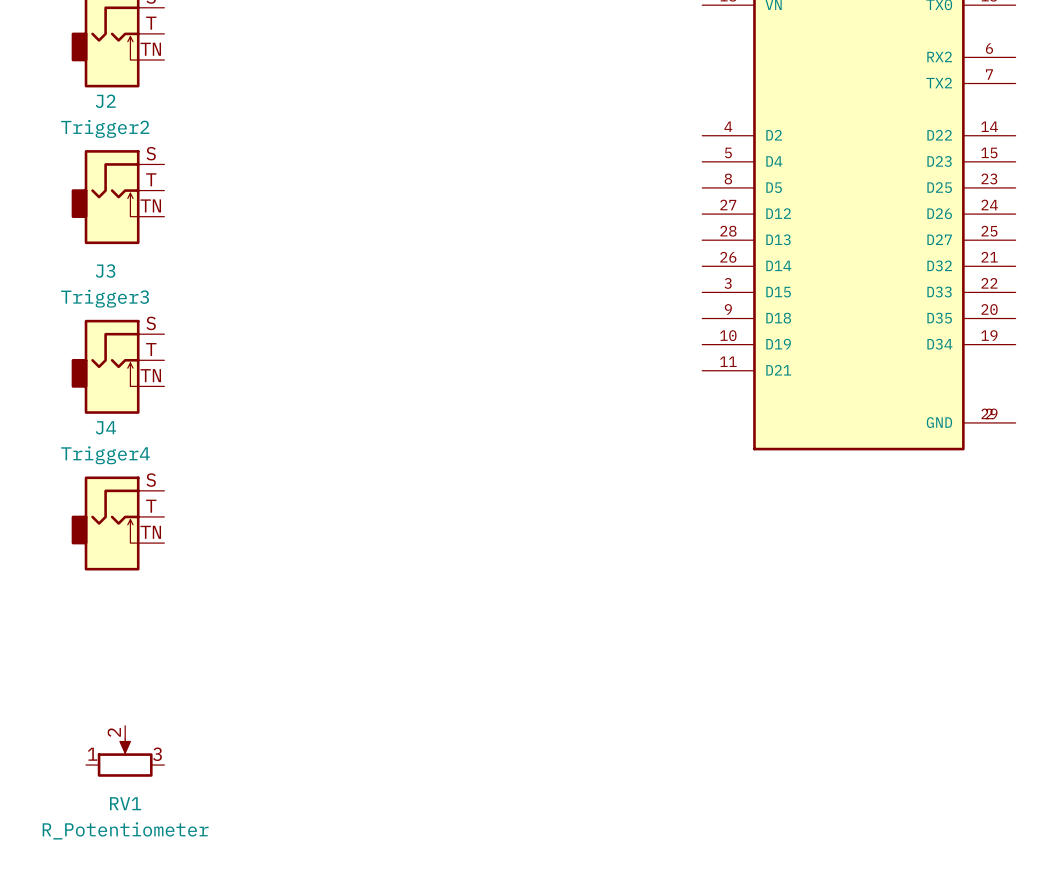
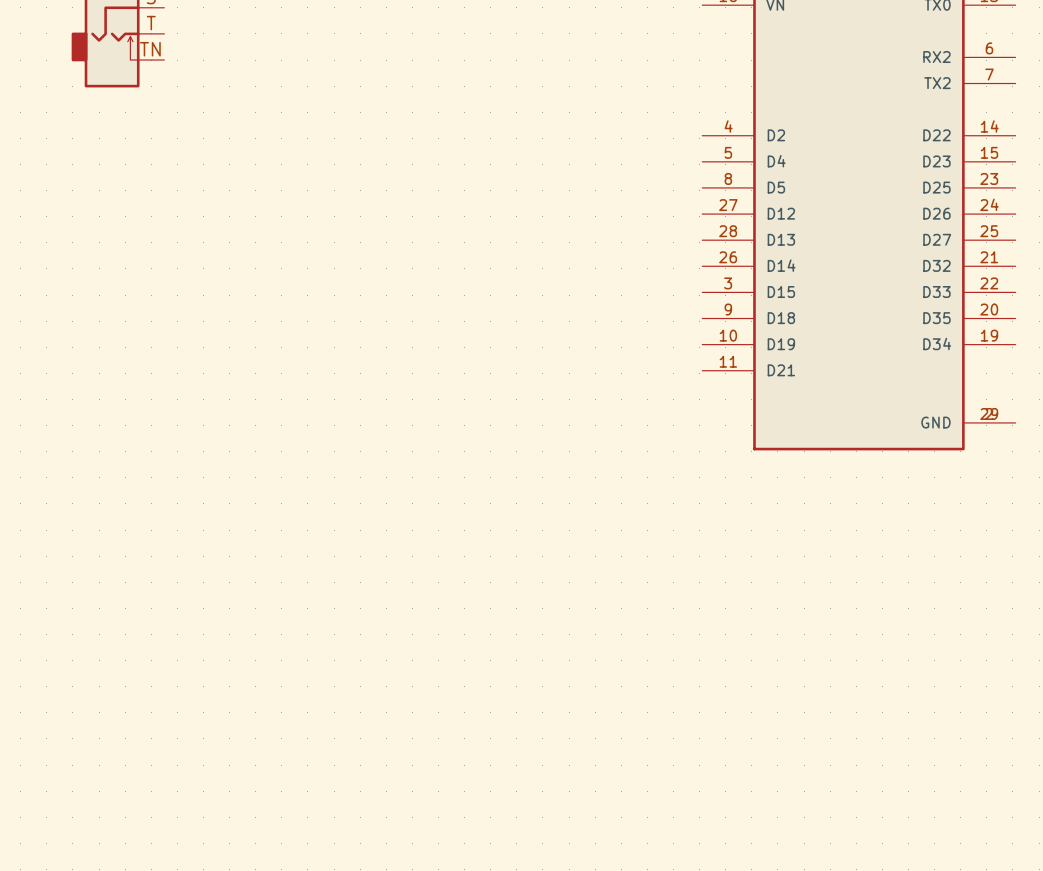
J2: Trigger2 (118, 197) -> none
J3: Trigger3 (118, 366) -> none
J4: Trigger4 (118, 523) -> none
RV1: R_Potentiometer (125, 751) -> none

